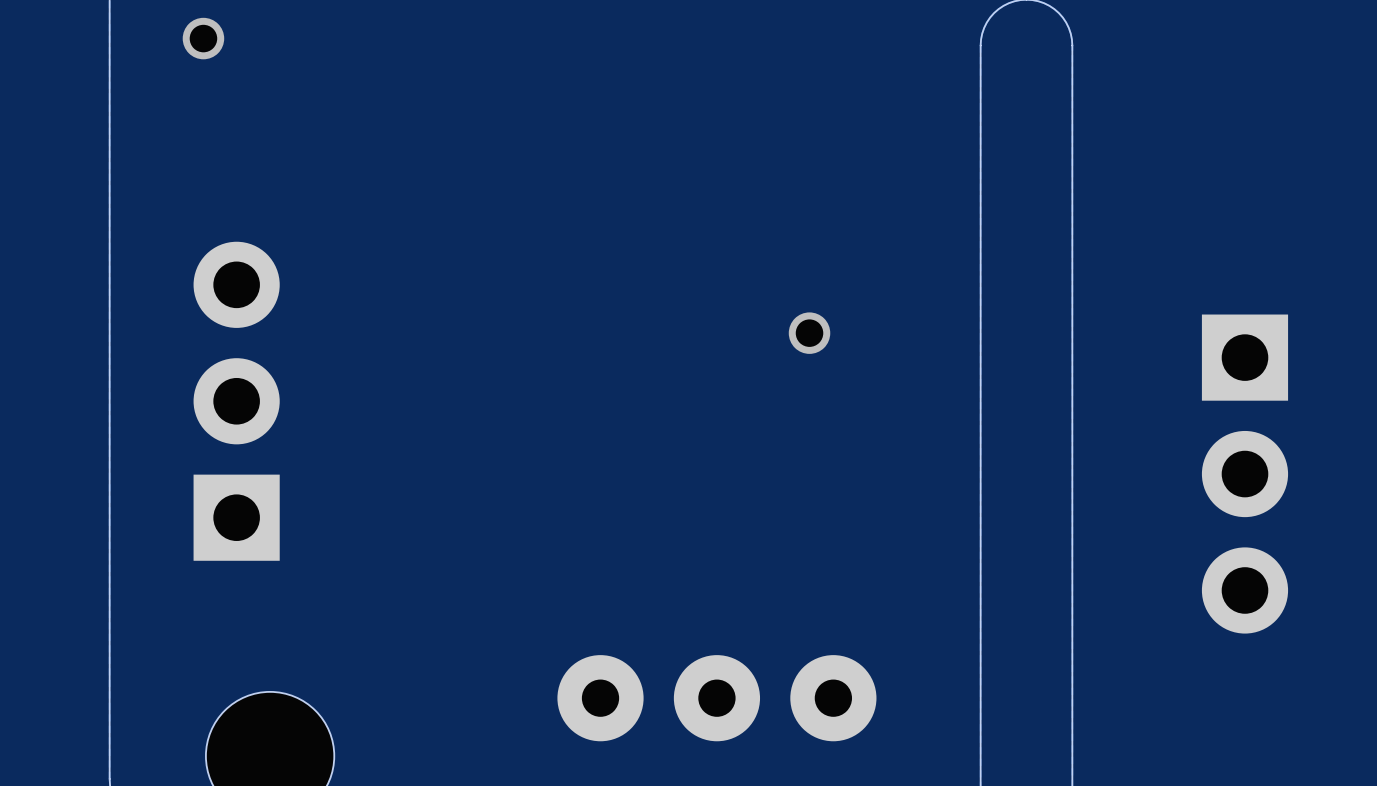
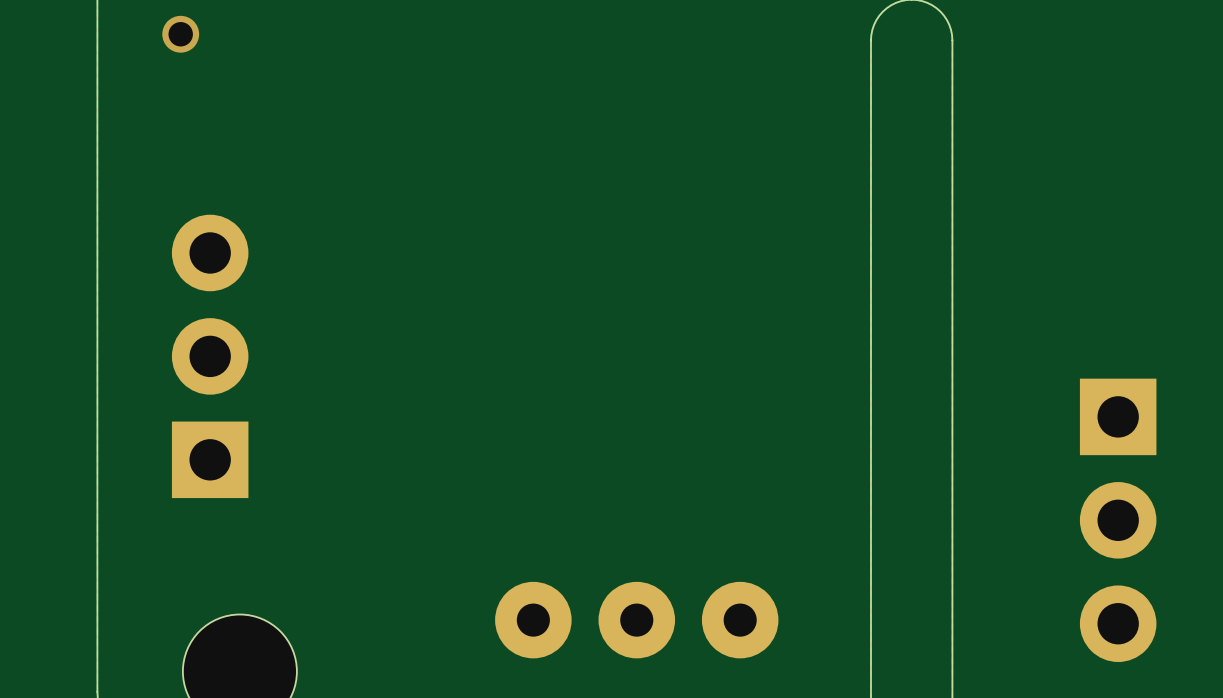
via: (809, 333) -> none
part position: (1244, 474) -> (1118, 520)

